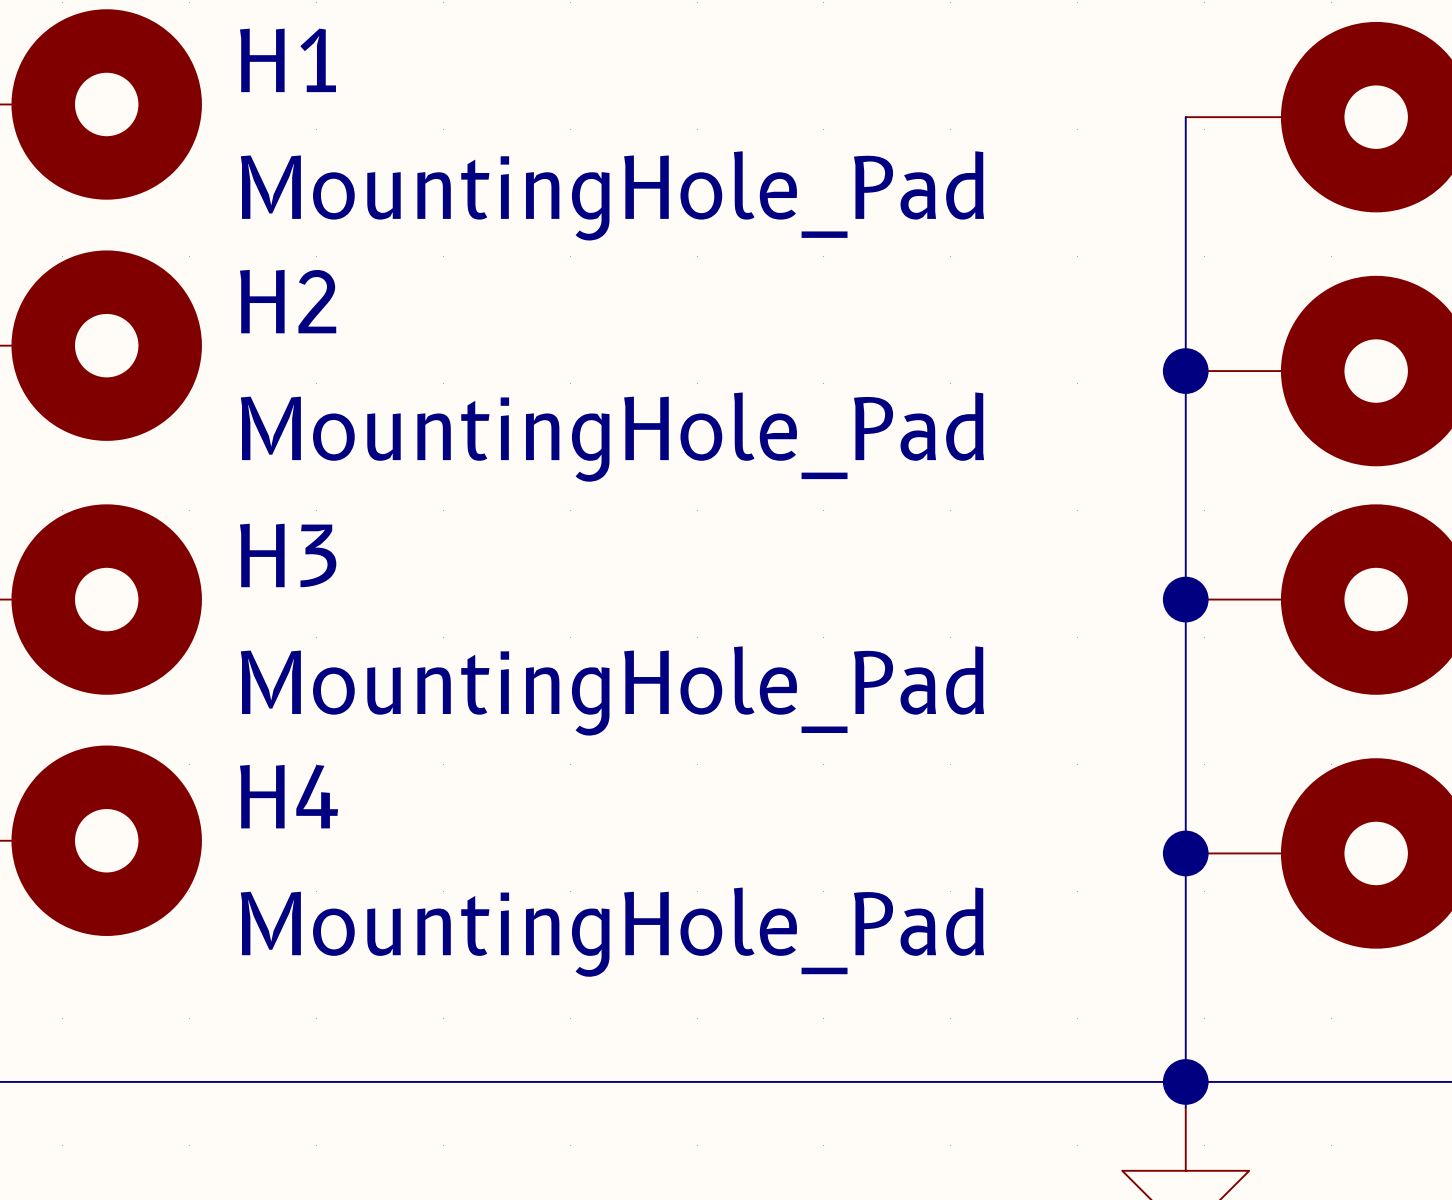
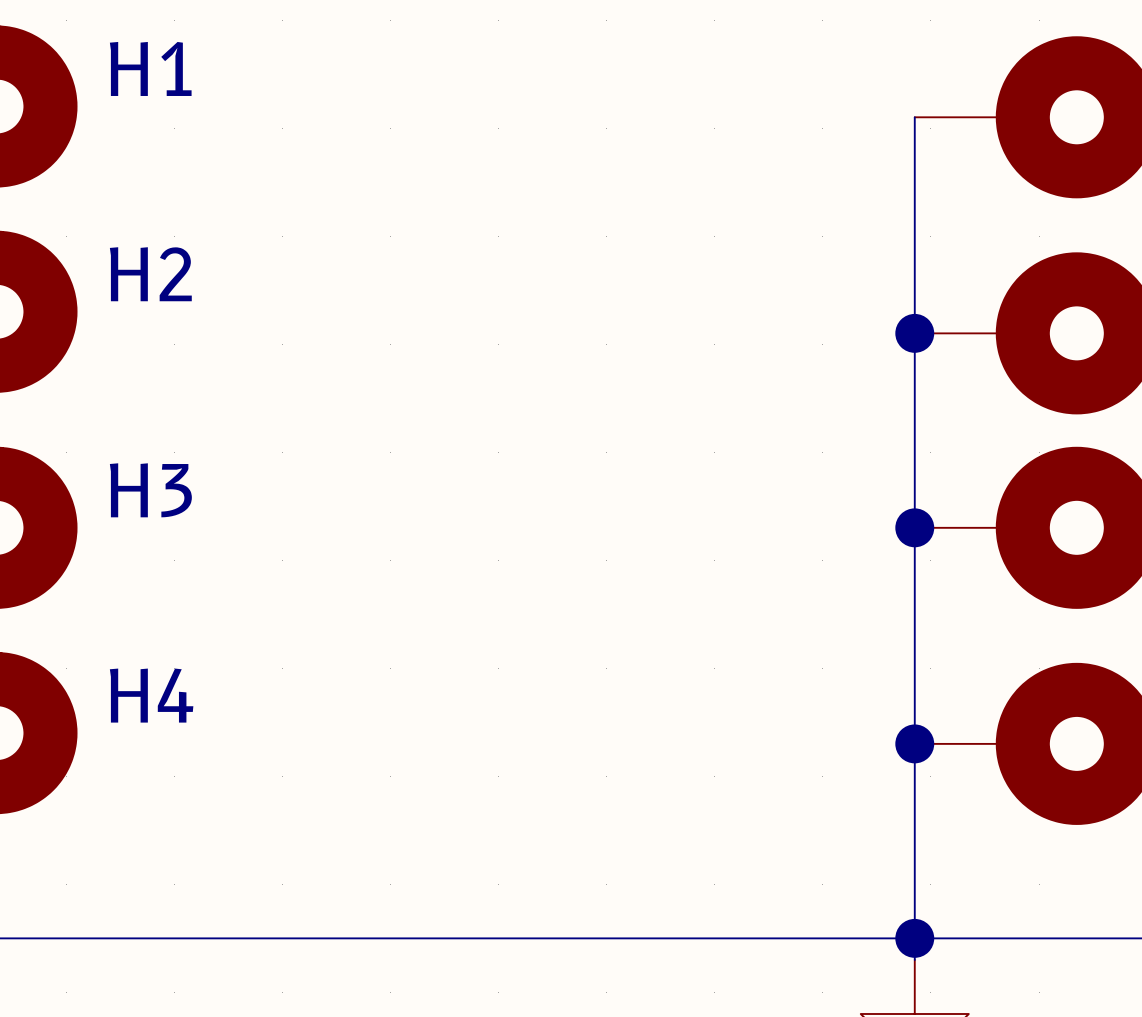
H1 value: MountingHole_Pad (612, 195) -> none
H2 value: MountingHole_Pad (612, 437) -> none
H3 value: MountingHole_Pad (612, 690) -> none
H4 value: MountingHole_Pad (612, 932) -> none

